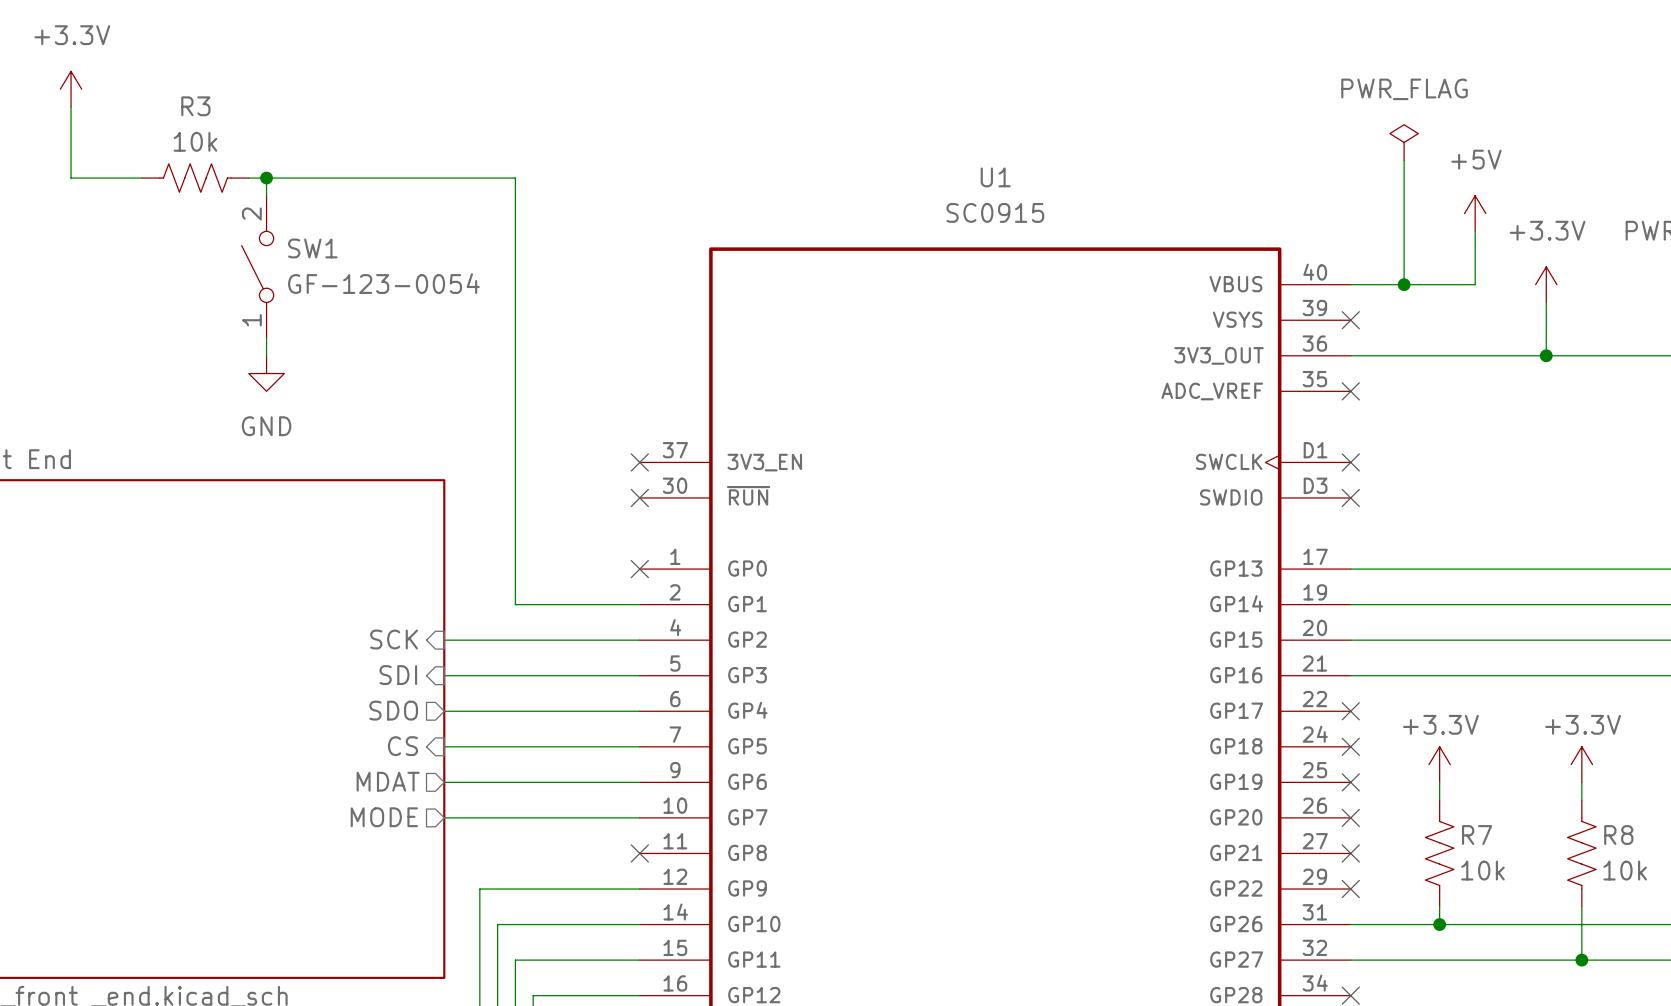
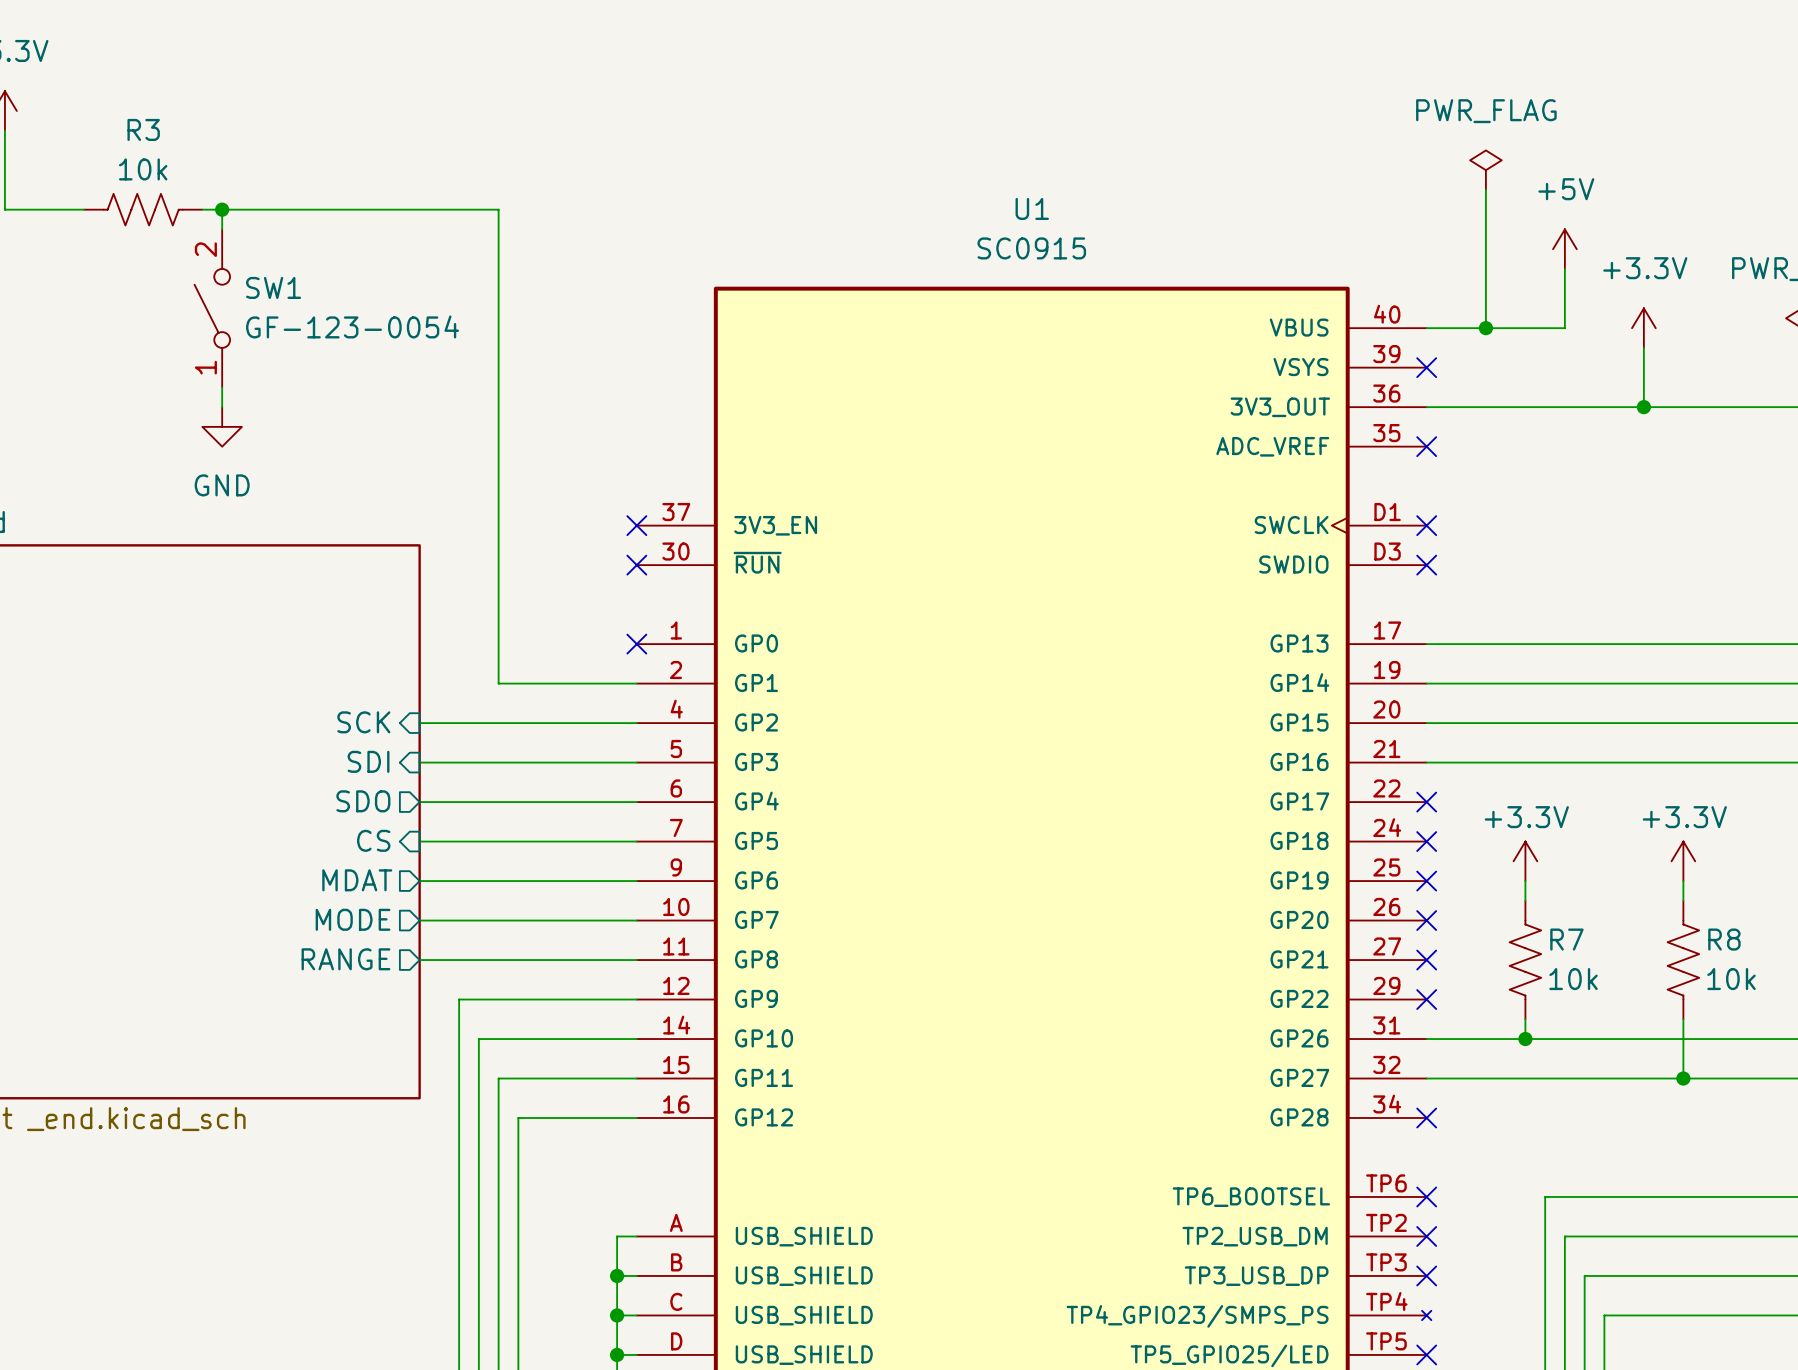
sheet pin: none -> RANGE (345, 959)
wire: none -> (419, 960) (636, 960)
no-connect mark: (639, 853) -> none

